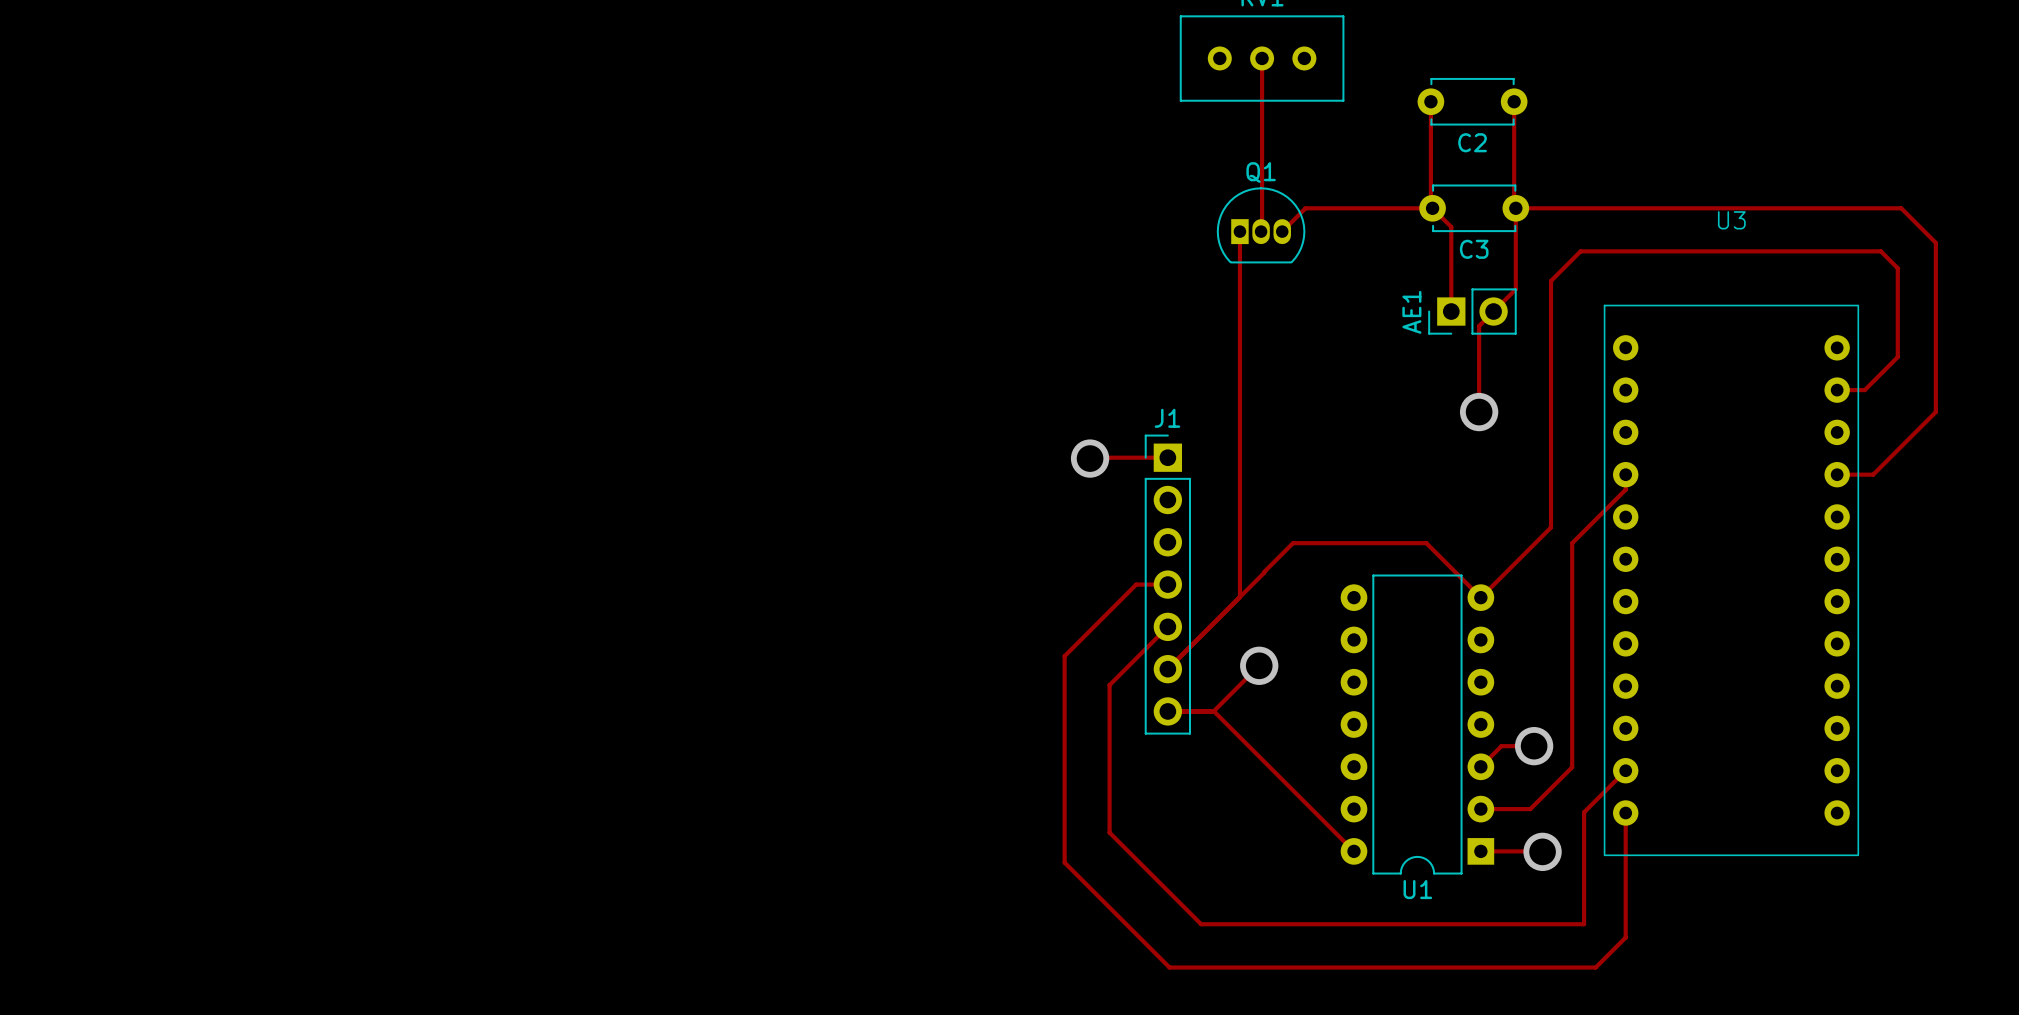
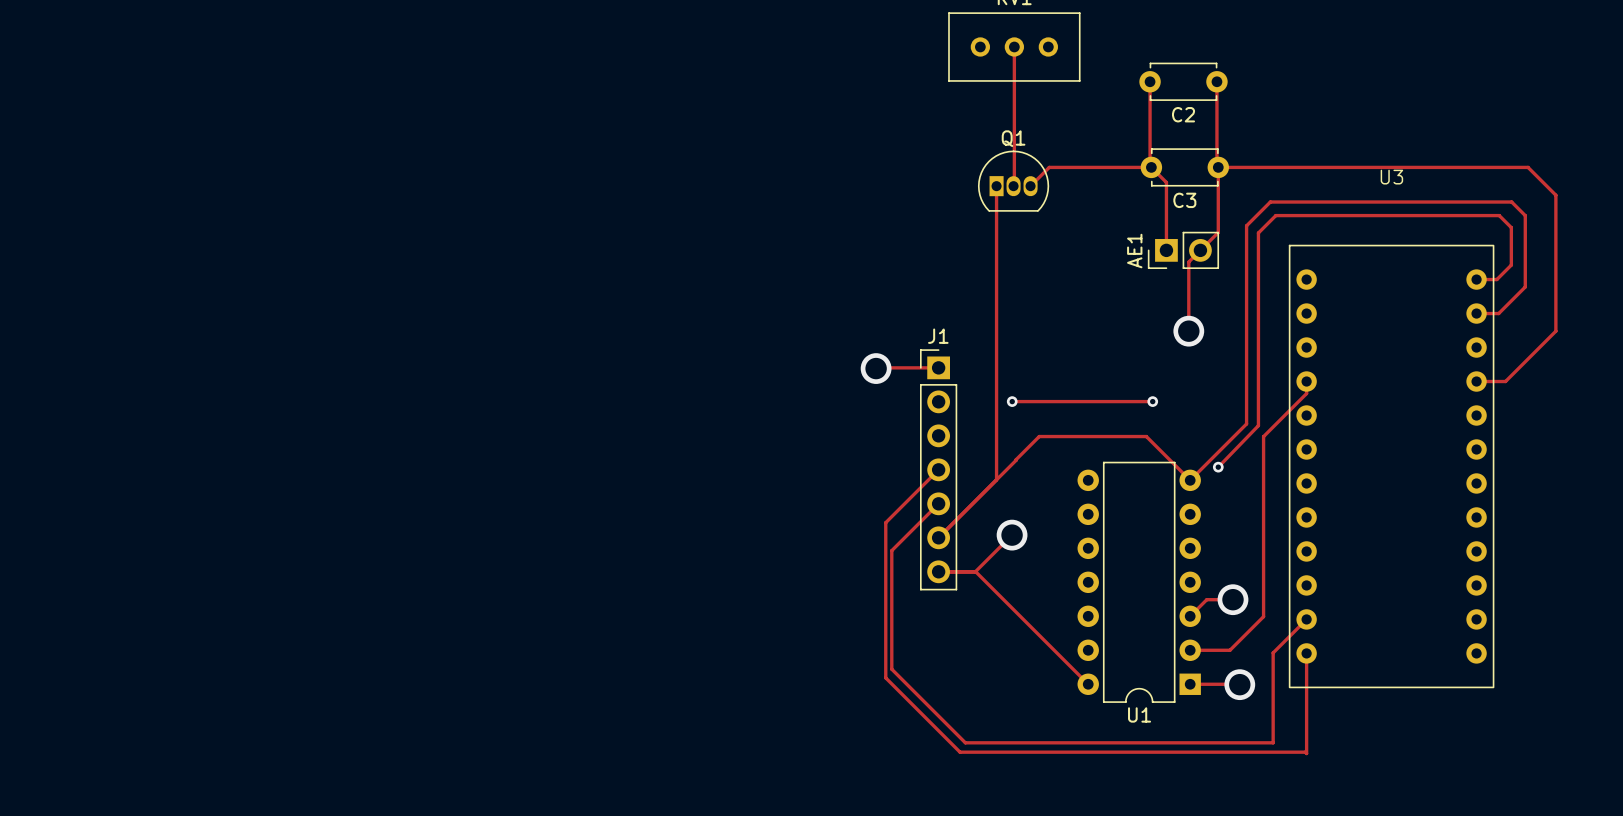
track: none -> (1476, 279) (1496, 279) (1511, 265) (1511, 227) (1499, 215) (1275, 215) (1258, 232) (1258, 425) (1218, 467)
track: none -> (1012, 401) (1152, 401)
via: none -> (1012, 401)
via: none -> (1152, 401)
via: none -> (1218, 467)
track: (1167, 584) (1136, 584) (1064, 656) (1064, 862) (1169, 967) (1595, 967) (1625, 937) -> (938, 469) (885, 522) (885, 677) (960, 752) (1306, 753)

